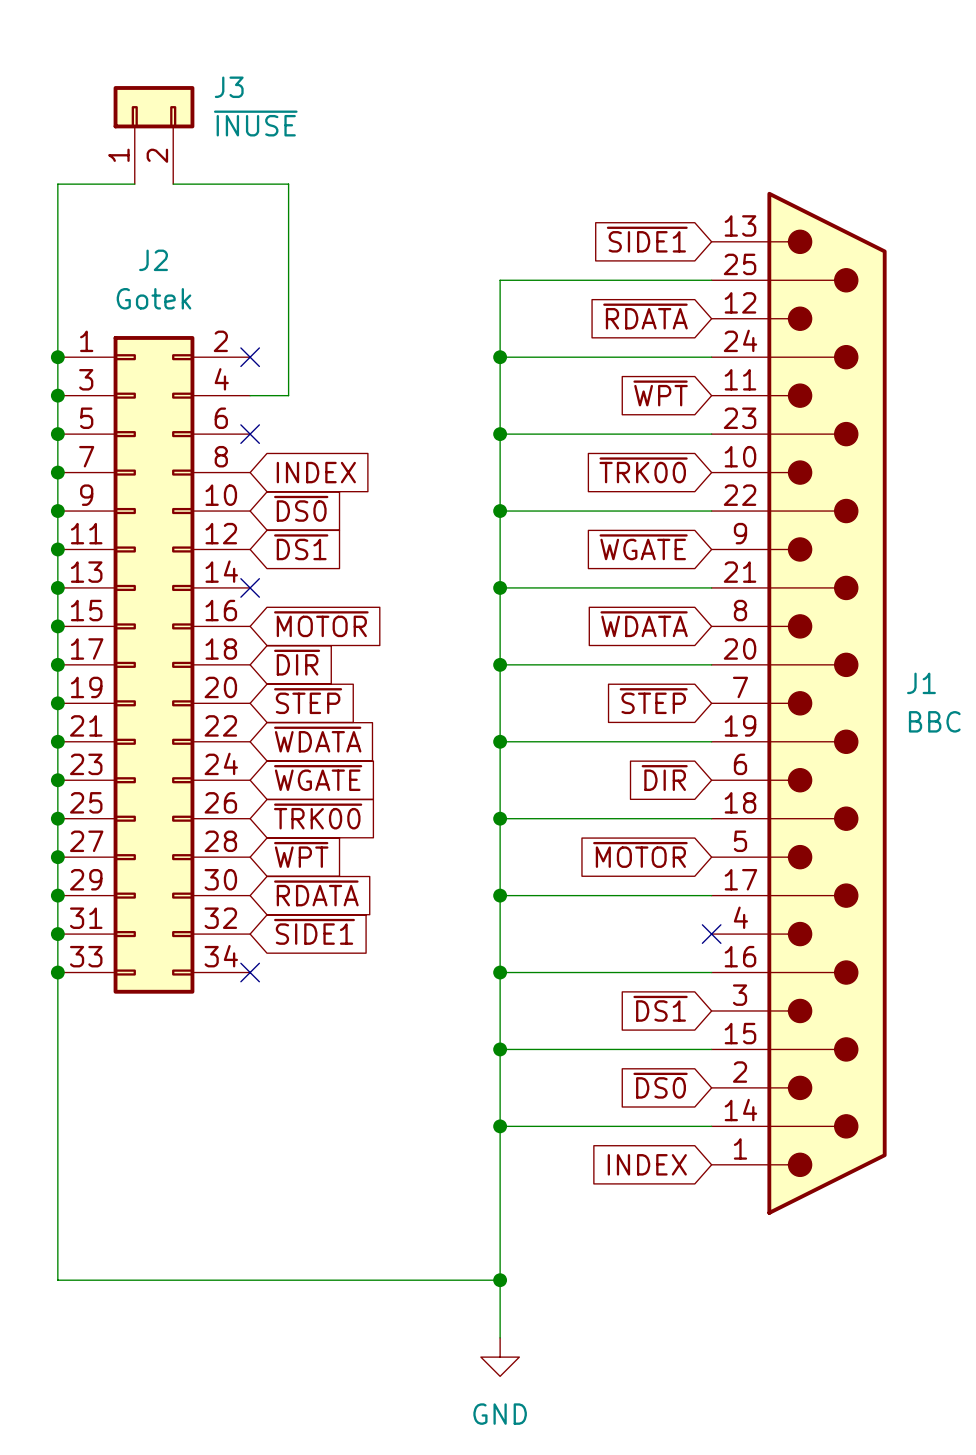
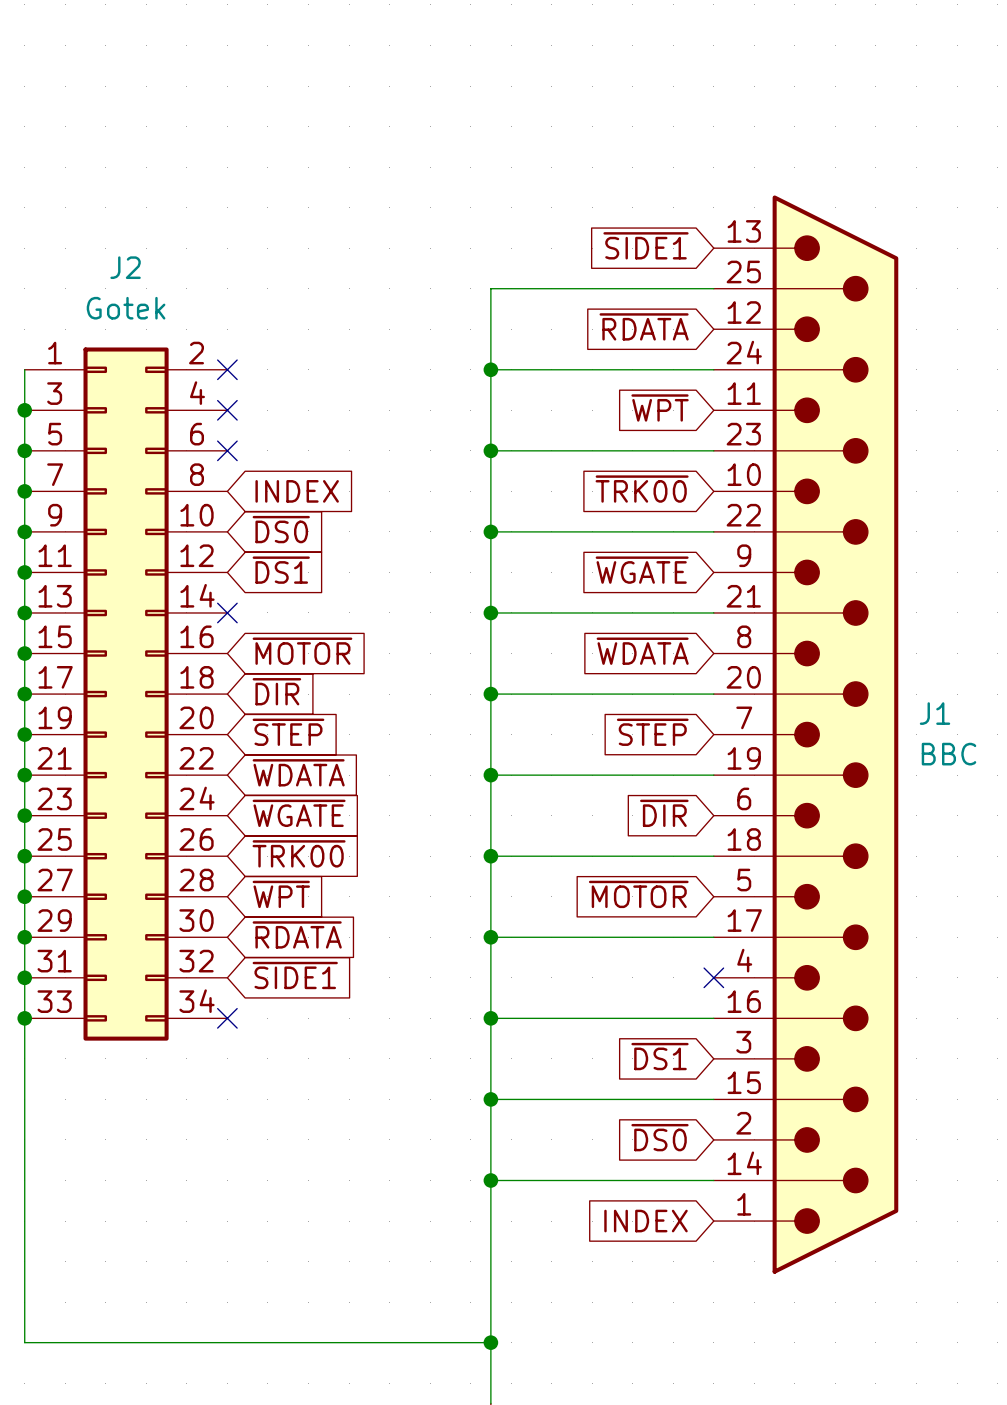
J3: ~{INUSE} (153, 135) -> none
wire: (134, 184) (57, 184) (57, 357) -> none
wire: (173, 184) (288, 184) (288, 395) (250, 395) -> none
junction: (57, 357) -> none
no-connect mark: none -> (227, 410)

